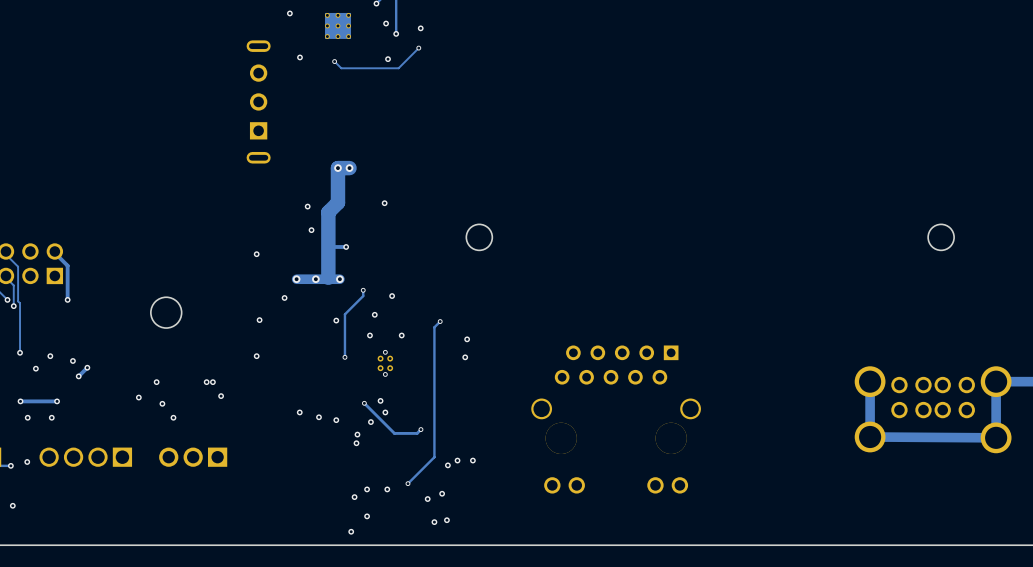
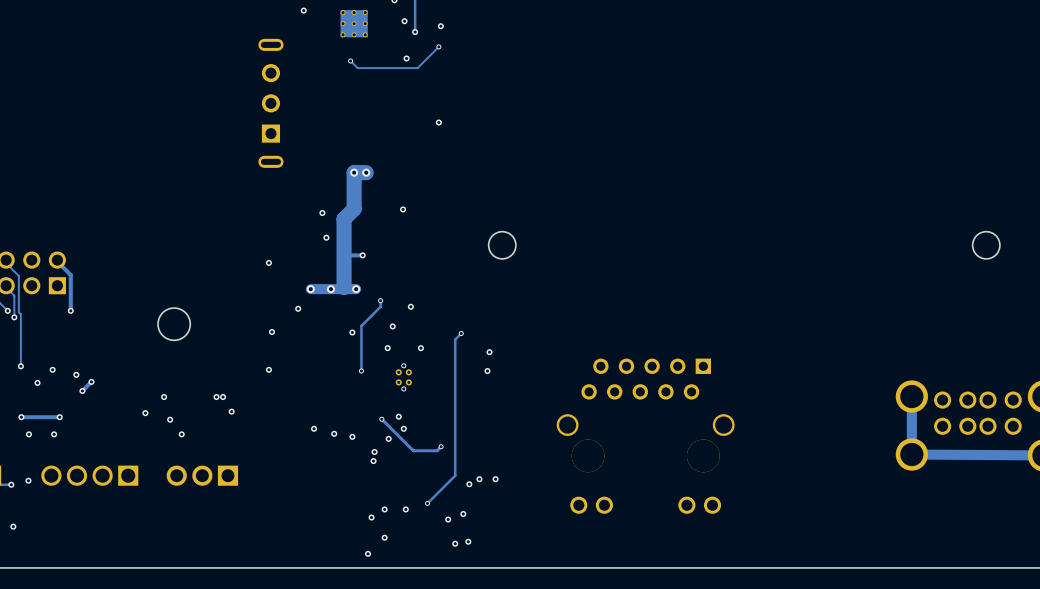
via: (299, 57) -> none
via: none -> (438, 122)

